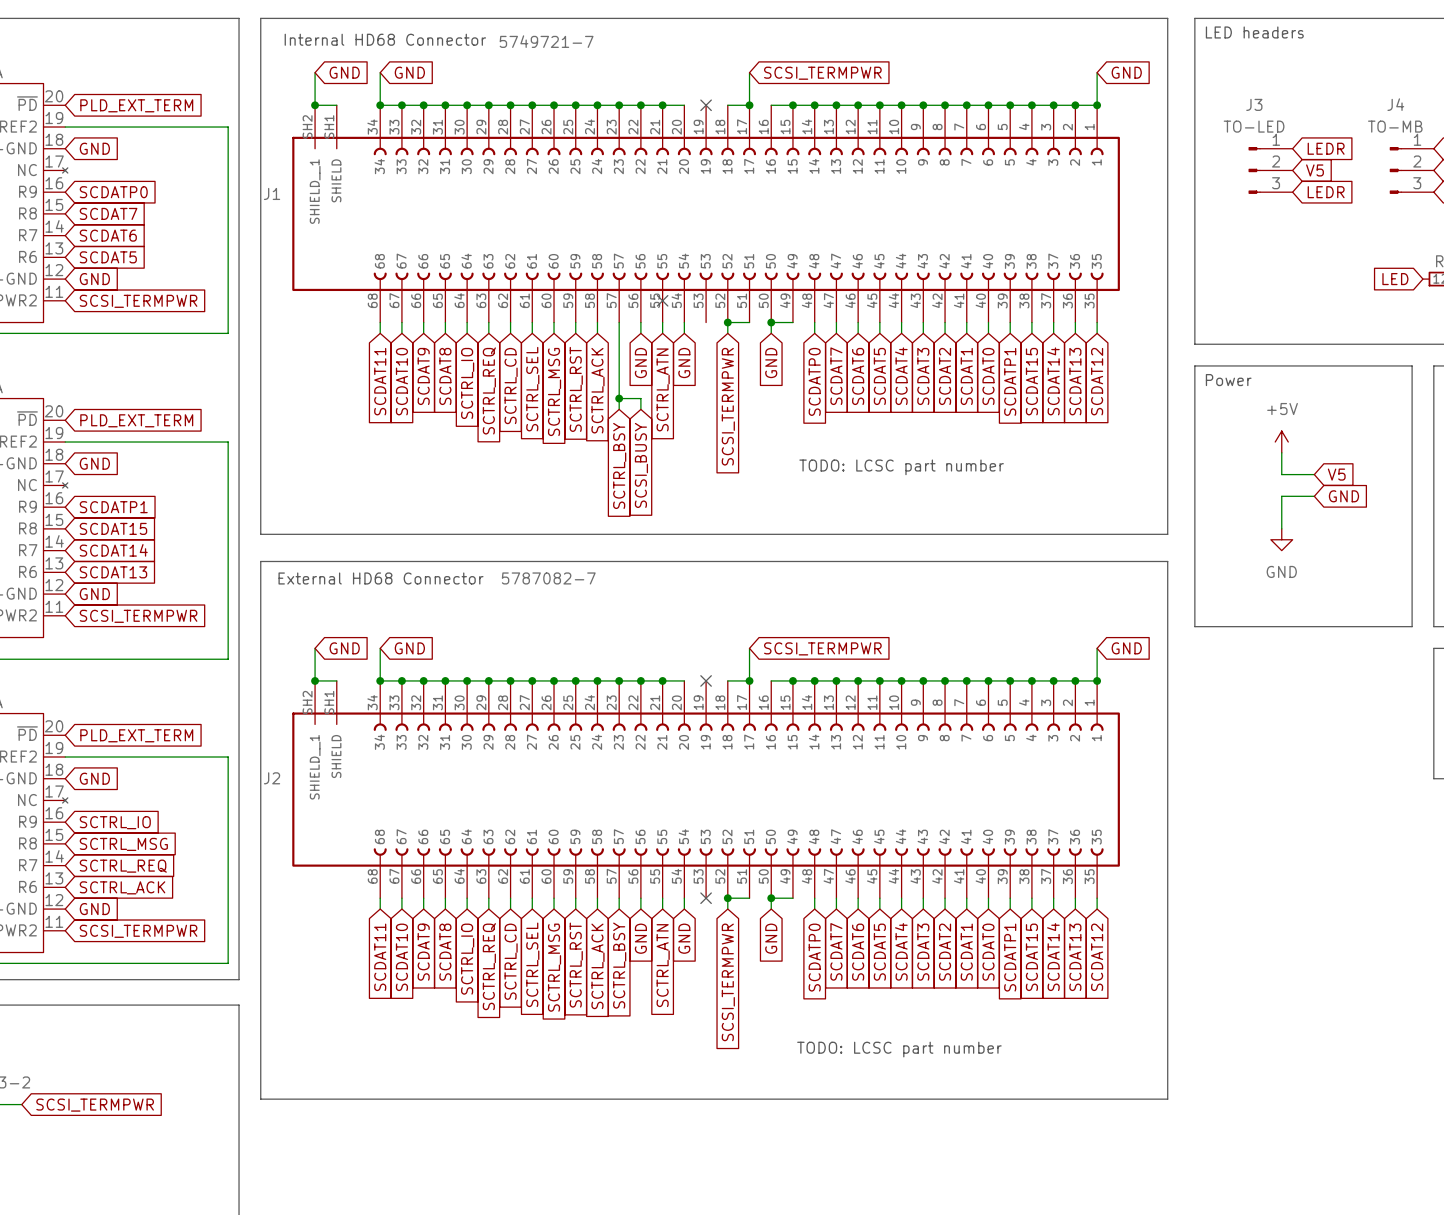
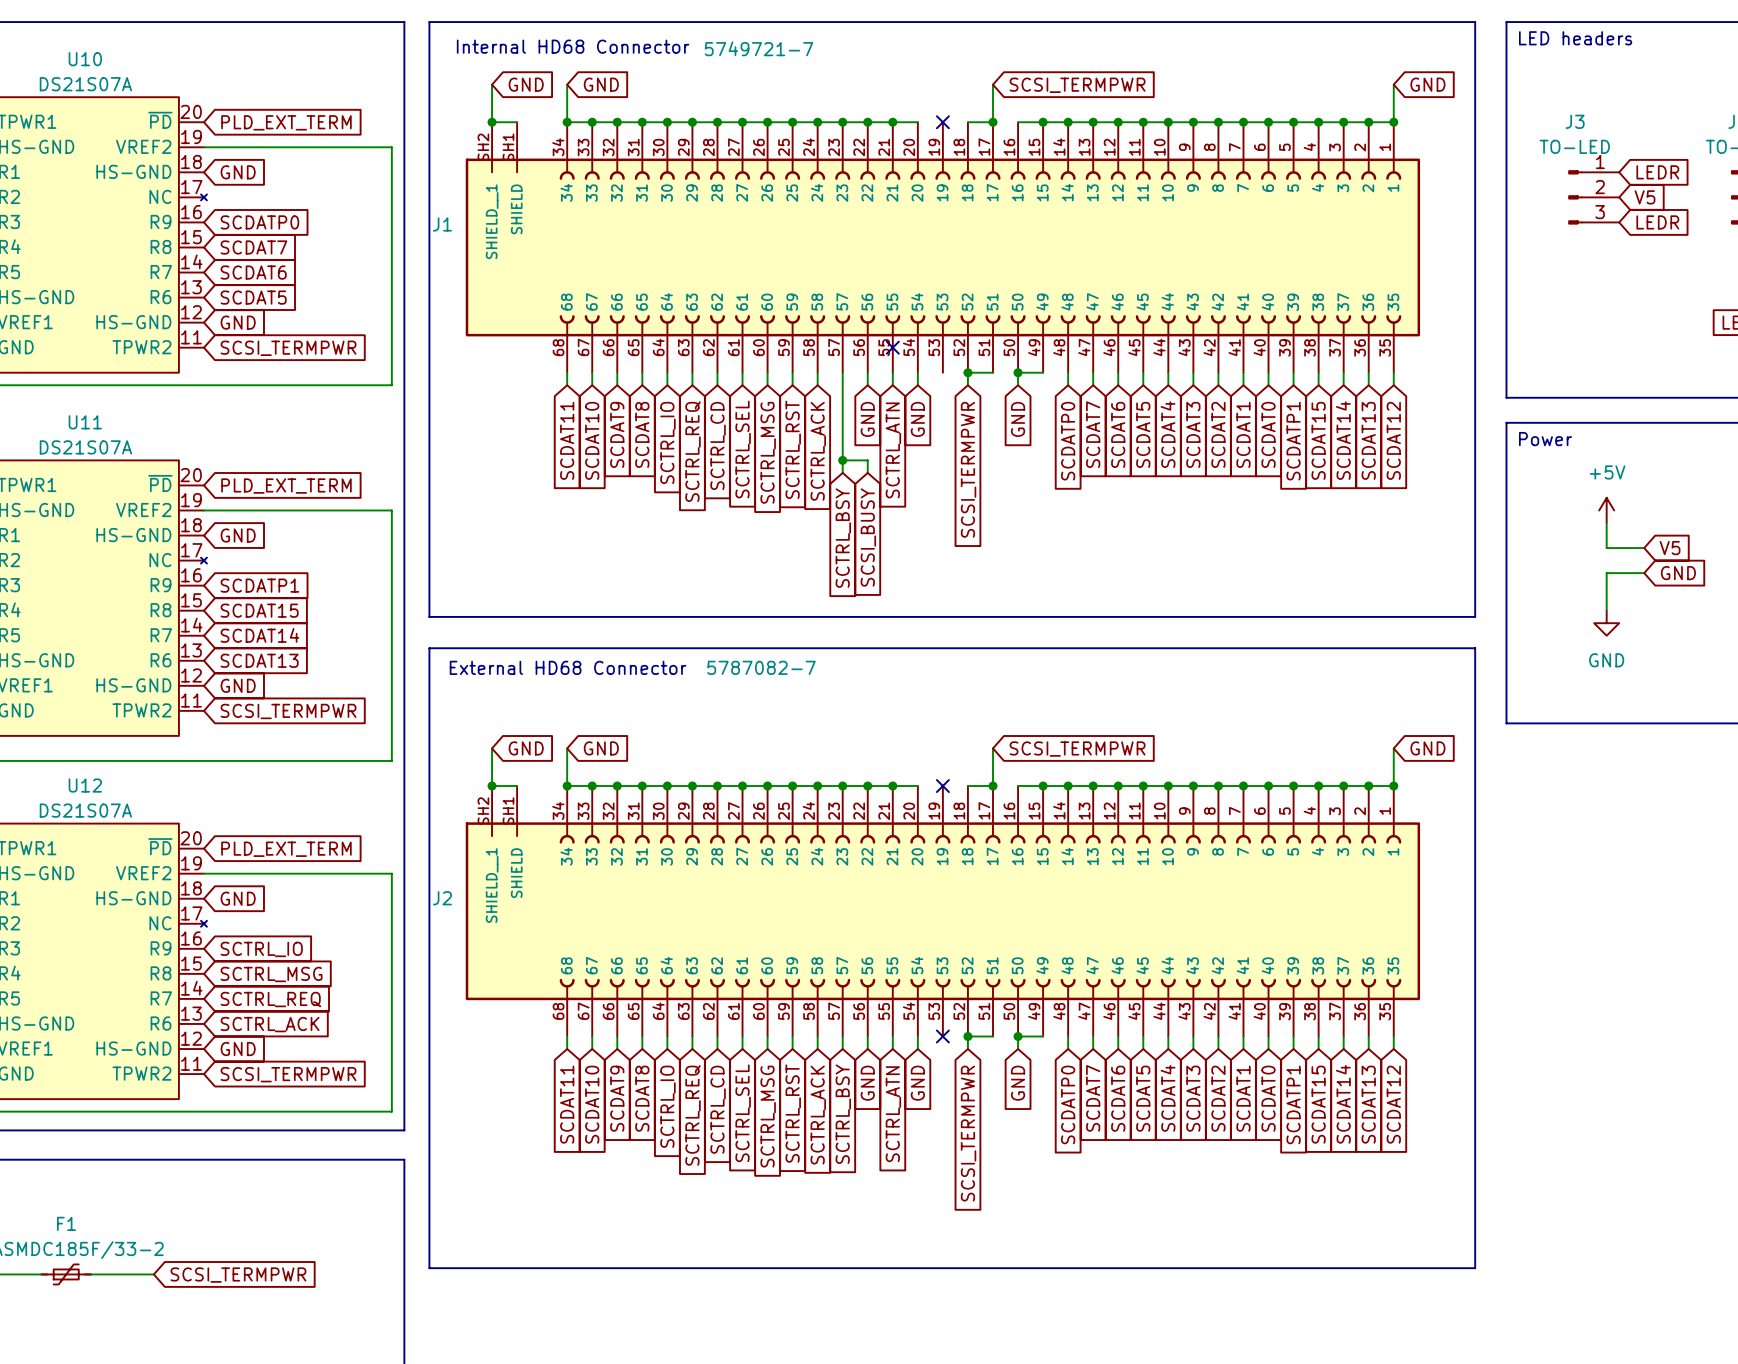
text: TODO: LCSC part number (901, 467) -> none
text: TODO: LCSC part number (899, 1049) -> none

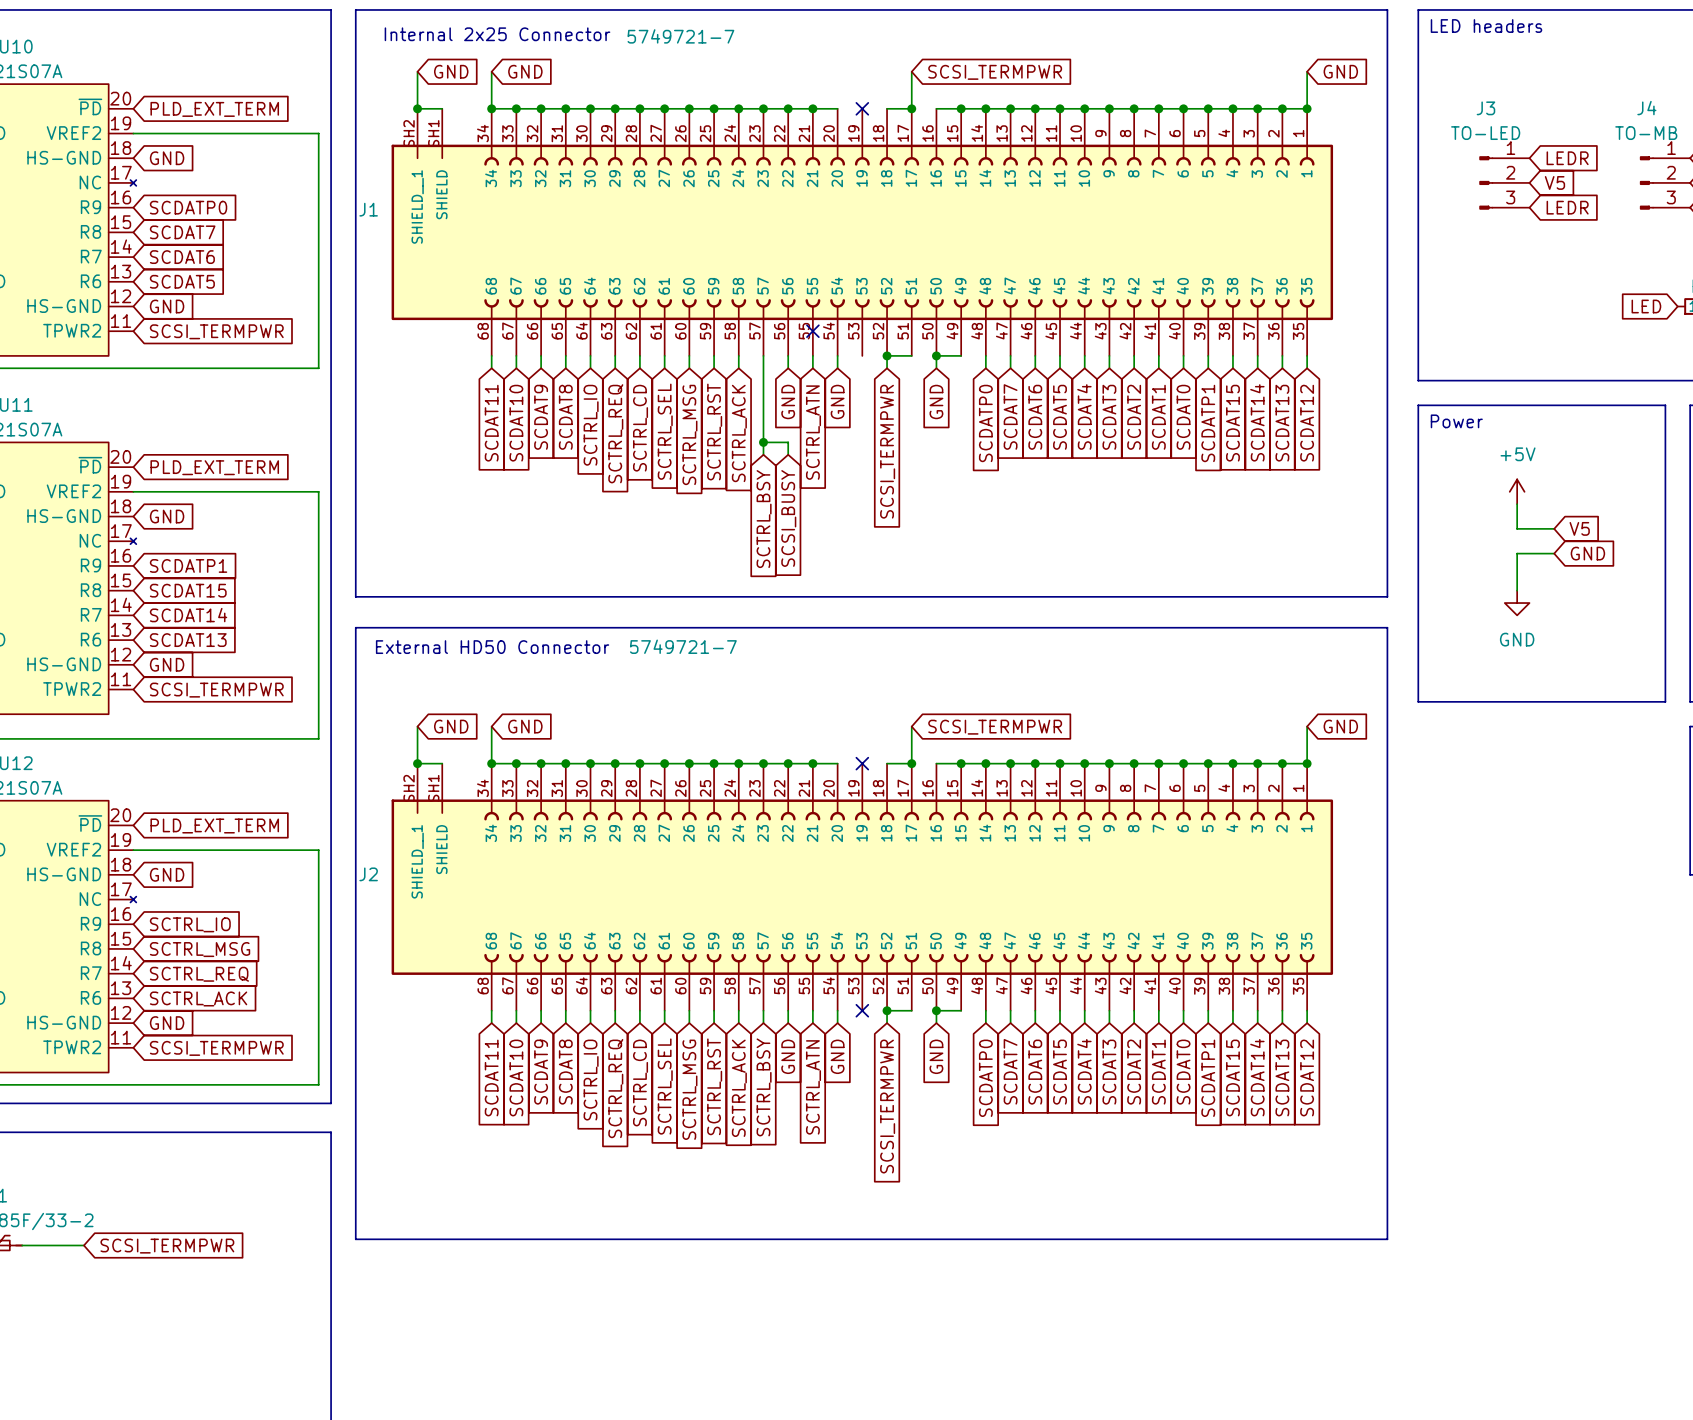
text: Internal HD68 Connector (573, 46) -> Internal 2x25 Connector (497, 34)
text: External HD68 Connector (568, 667) -> External HD50 Connector (492, 647)
J2 value: 5787082-7 (761, 667) -> 5749721-7 (683, 646)

